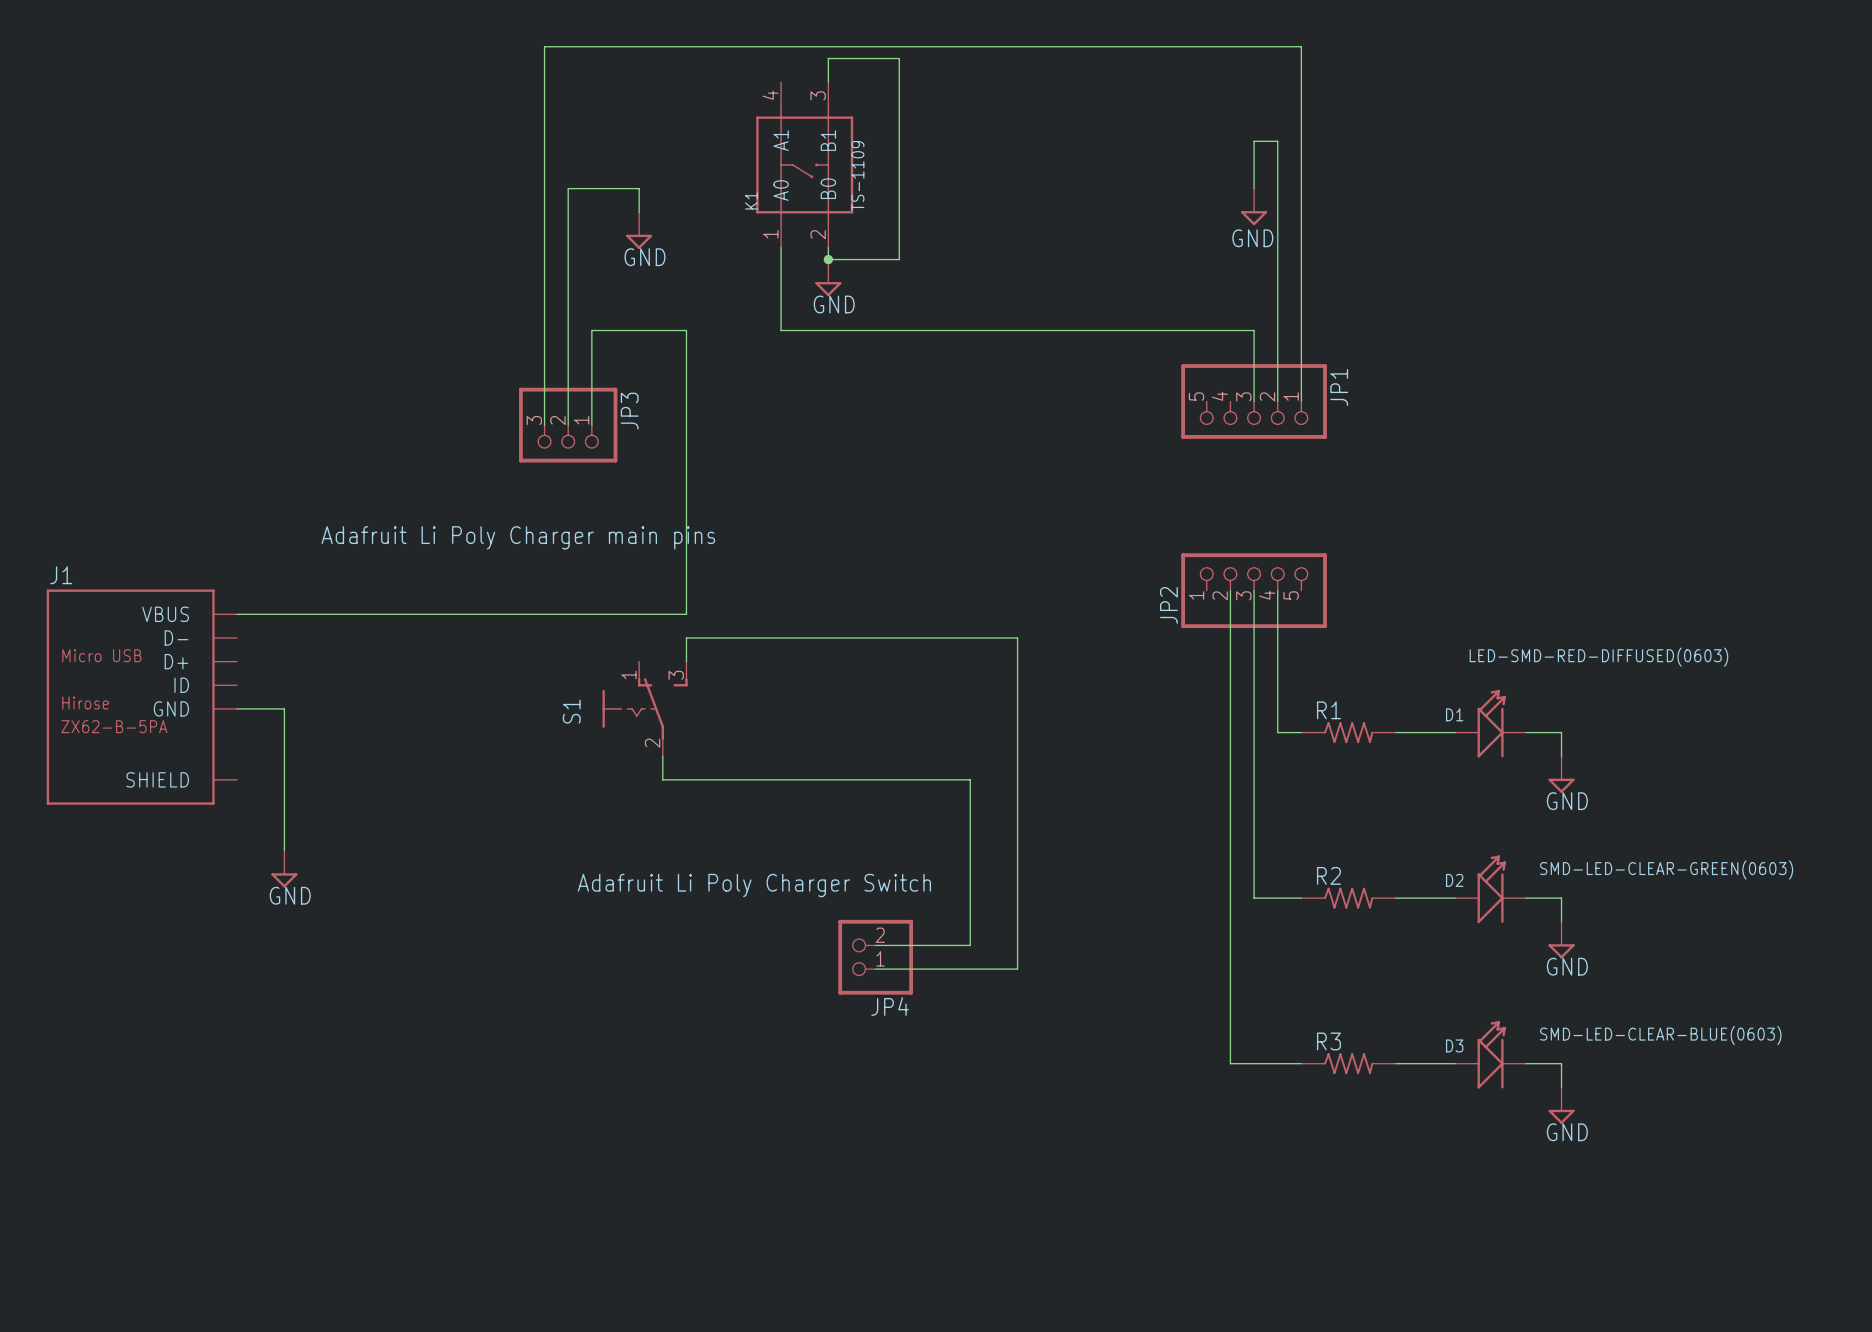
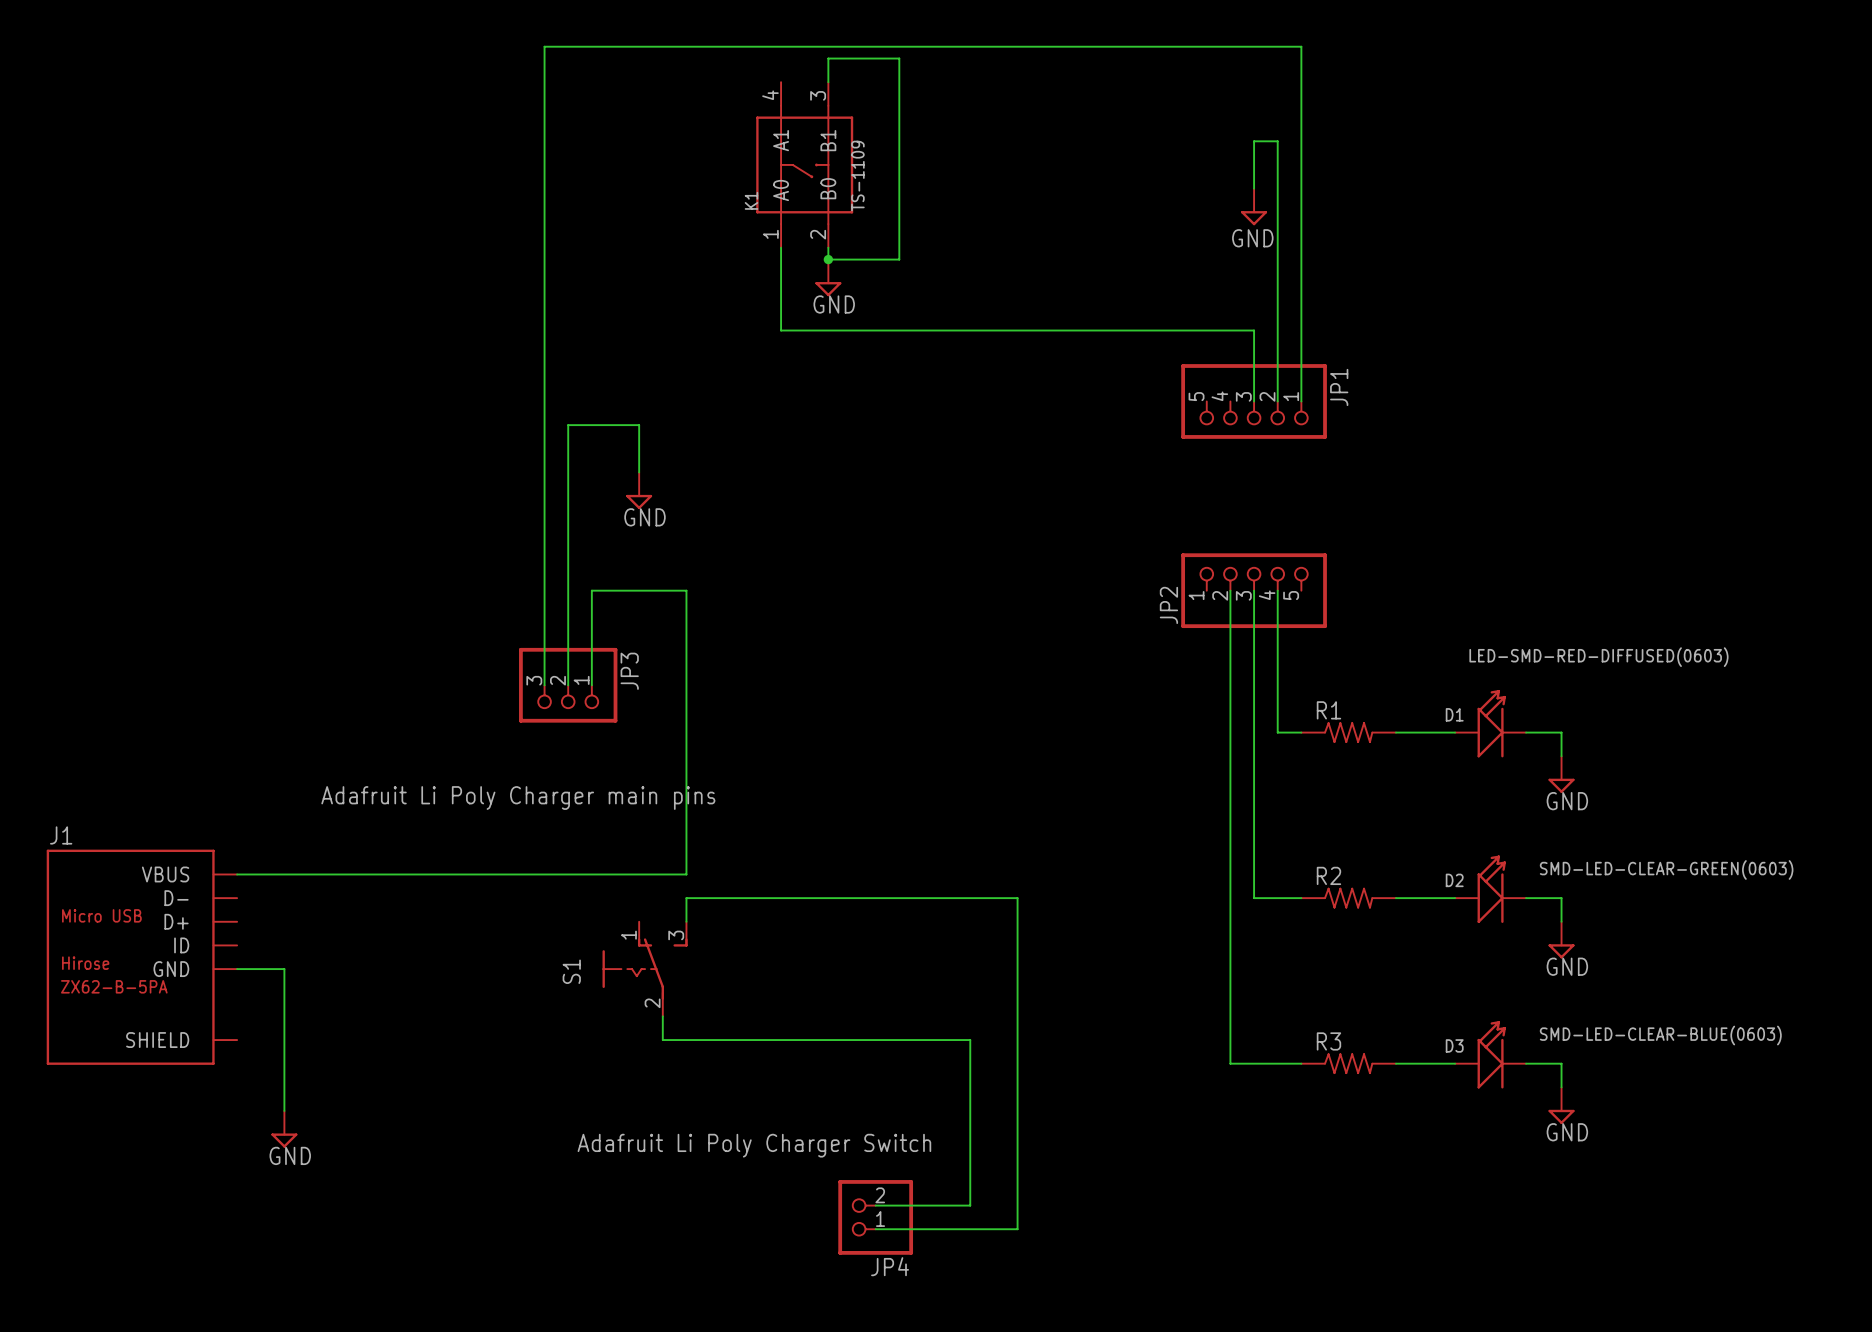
wire: (639, 212) (639, 188) (568, 188) (568, 425) -> none
power symbol: GND (639, 230) -> none
wire: none -> (544, 425) (544, 685)
JP3 position: (568, 425) -> (568, 685)
wire: (591, 425) (591, 330) (686, 330) (686, 590) -> (591, 685) (591, 590) (686, 590)
wire: none -> (639, 472) (639, 425) (568, 425) (568, 685)
power symbol: none -> GND (639, 490)
wire: (237, 614) (686, 614) -> (686, 637) (686, 614)
wire: (686, 637) (1017, 637) (1017, 898) -> (686, 921) (686, 898) (1017, 898)
wire: none -> (686, 661) (686, 874) (237, 874)
J1 position: (141, 697) -> (141, 957)
wire: (237, 708) (284, 708) (284, 850) -> none
S1 position: (645, 708) -> (645, 969)
wire: (662, 756) (662, 779) (970, 779) (970, 945) (875, 945) -> none
power symbol: GND (284, 869) -> none
JP4 position: (875, 957) -> (875, 1217)
wire: none -> (237, 969) (284, 969) (284, 1110)
wire: (875, 969) (1017, 969) -> (875, 1229) (1017, 1229) (1017, 969)
wire: none -> (662, 1016) (662, 1040) (970, 1040) (970, 1205) (875, 1205)
power symbol: none -> GND (284, 1129)

